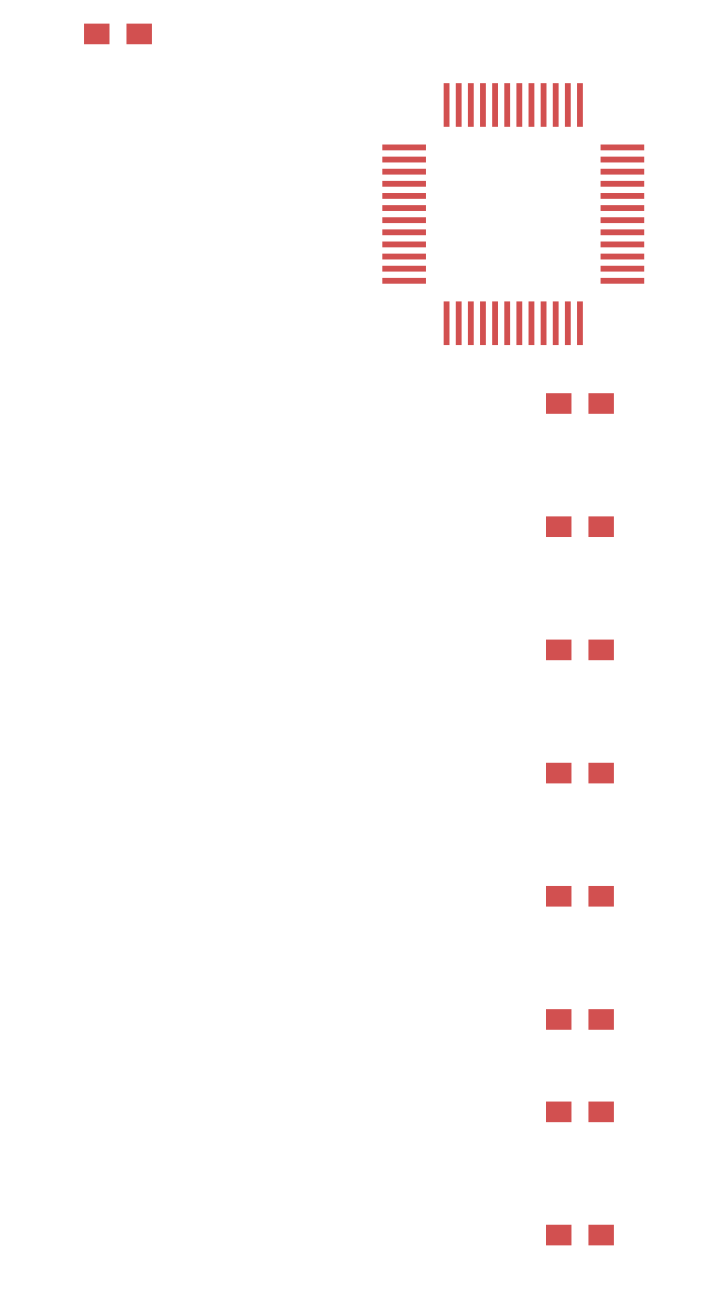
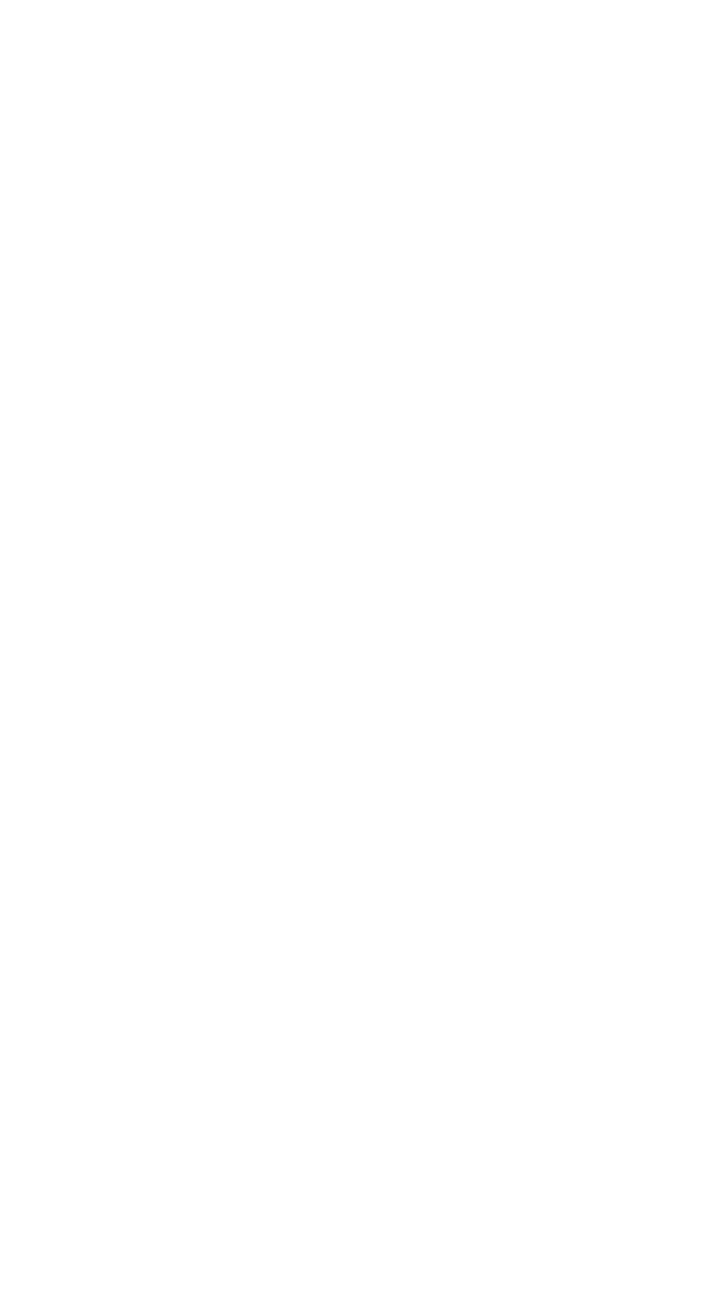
part: (117, 33) -> none
part: (513, 214) -> none
part: (579, 403) -> none
part: (579, 526) -> none
part: (579, 649) -> none
part: (579, 773) -> none
part: (579, 896) -> none
part: (579, 1019) -> none
part: (579, 1111) -> none
part: (579, 1235) -> none

